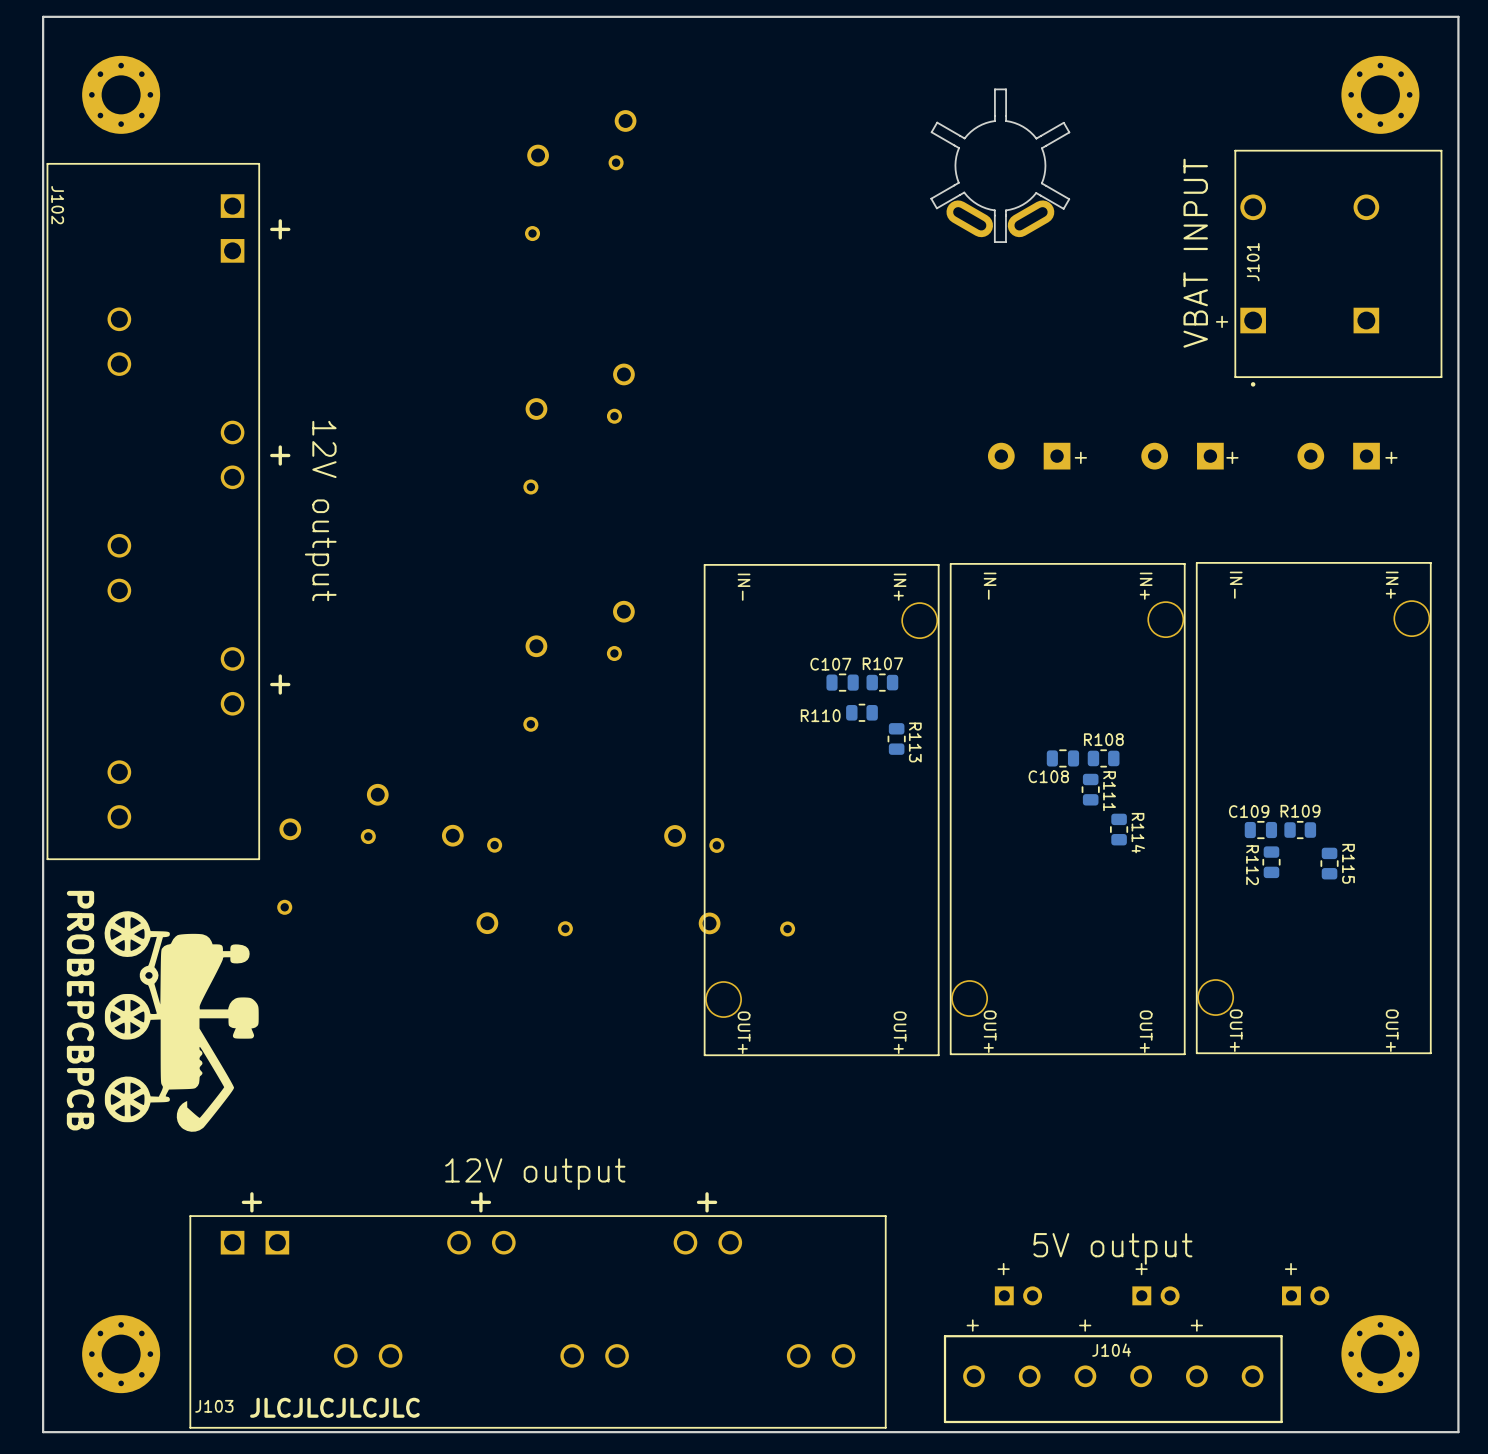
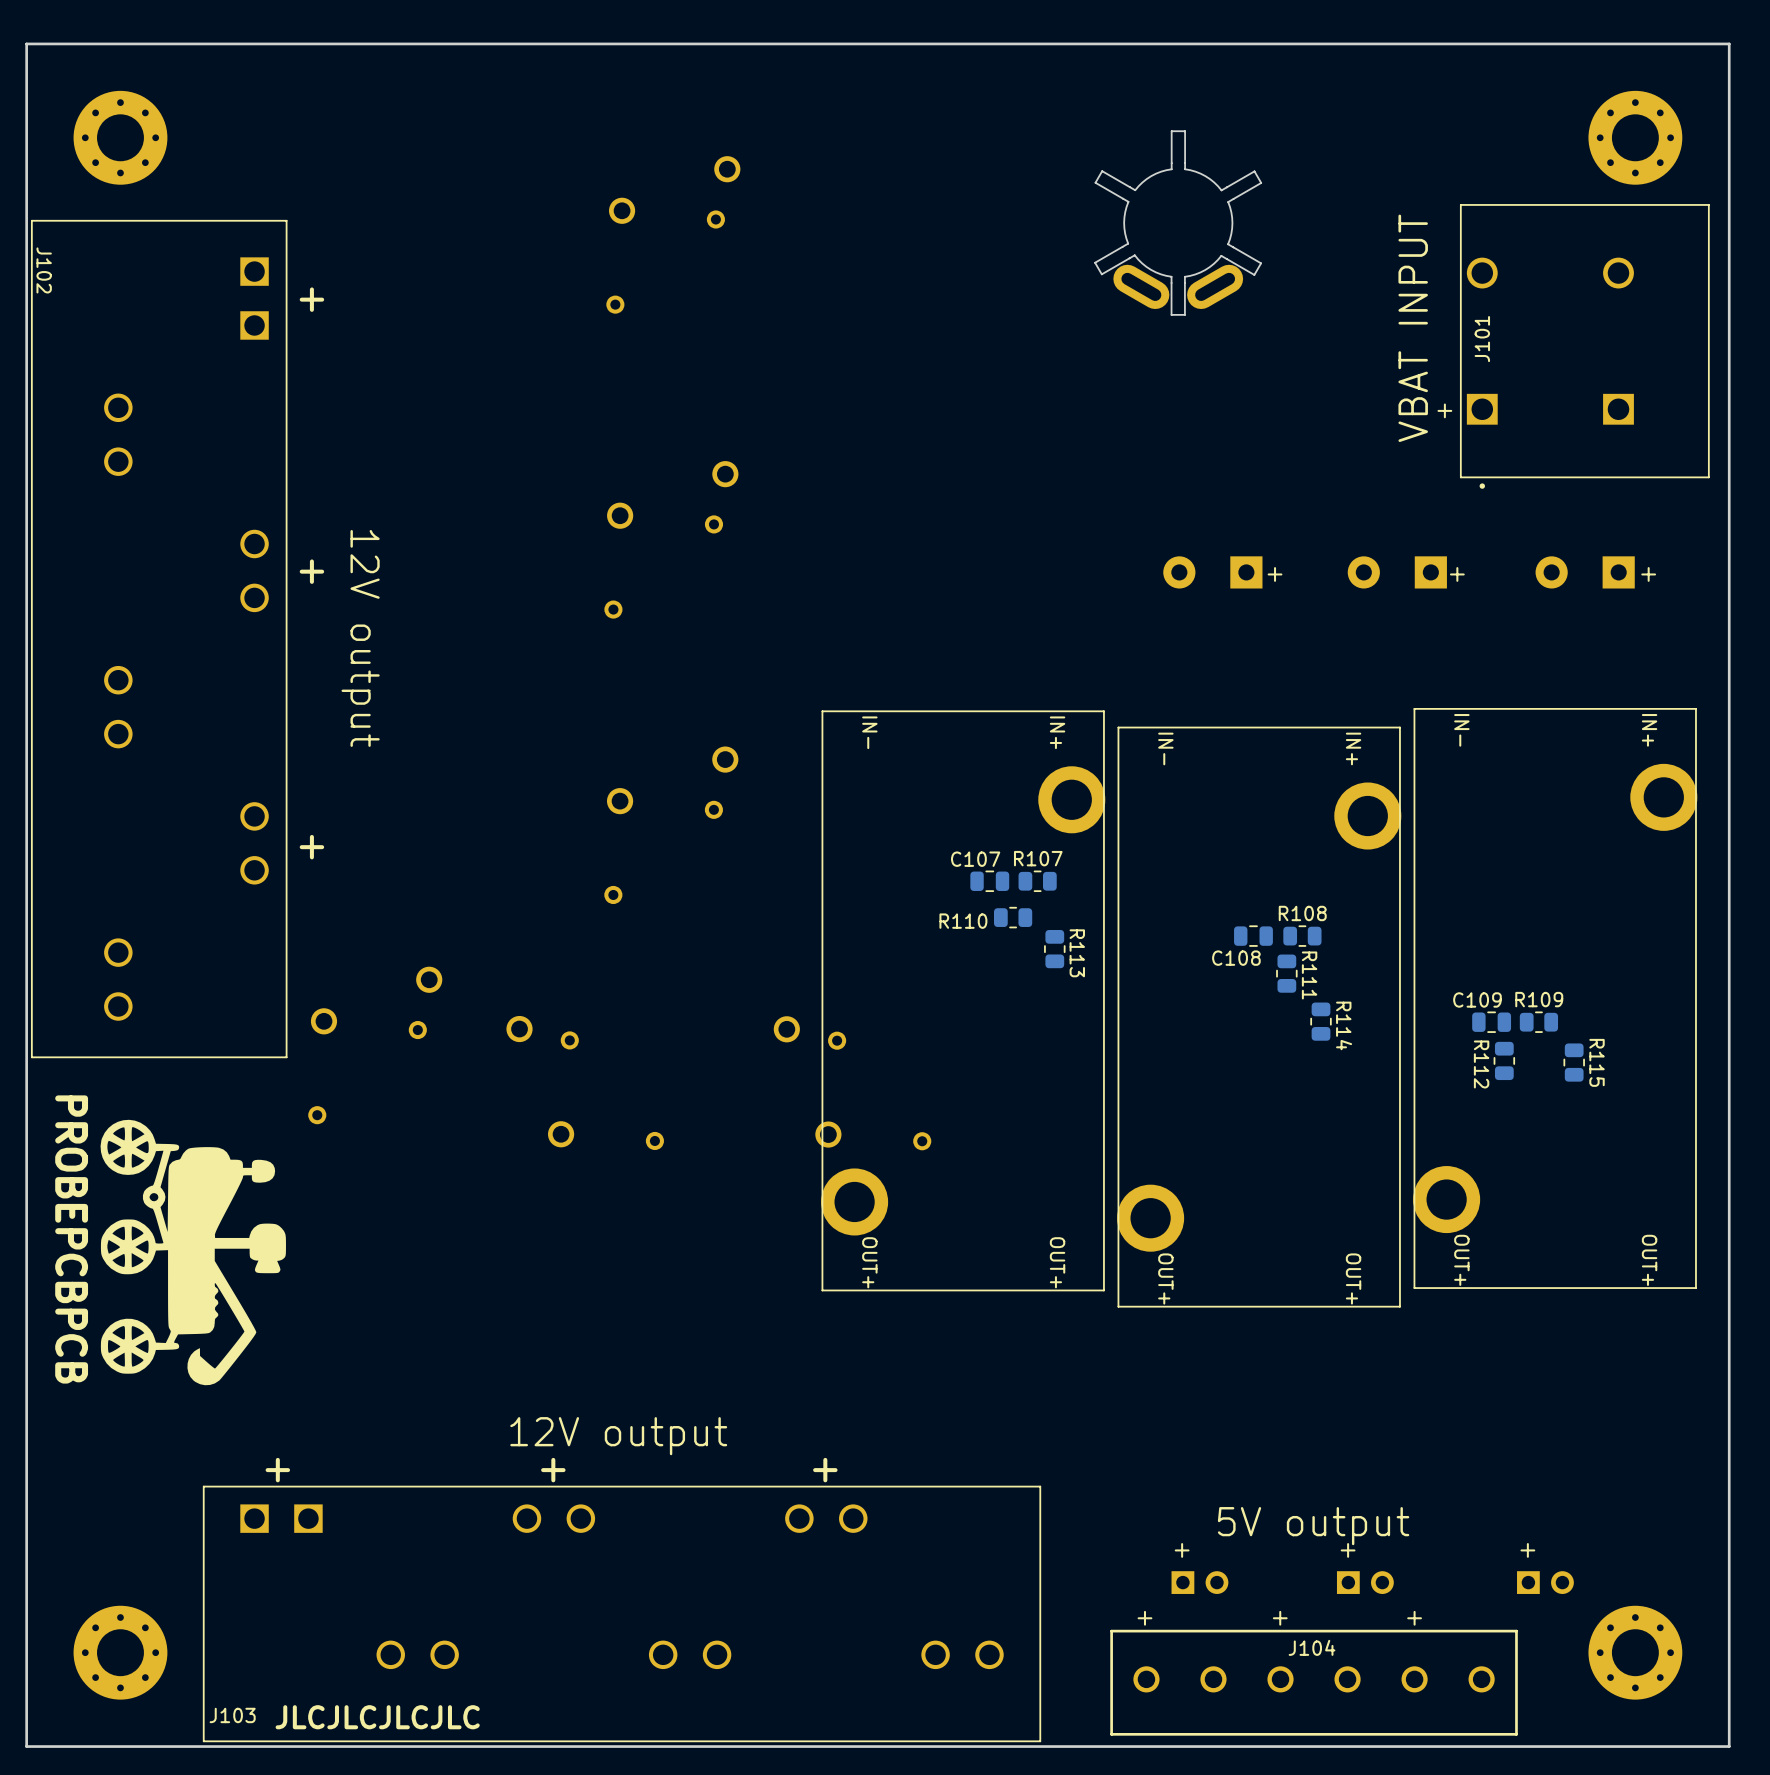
part footprint: [1196, 562, 1432, 1054] -> [1413, 708, 1698, 1289]
part footprint: [703, 564, 940, 1056] -> [821, 710, 1106, 1292]
C107 position: (842, 682) -> (989, 881)
R107 position: (882, 682) -> (1037, 881)
R110 position: (861, 712) -> (1013, 917)
R113 position: (896, 738) -> (1054, 949)
part: (1067, 809) -> none
part: none -> (1259, 1017)

